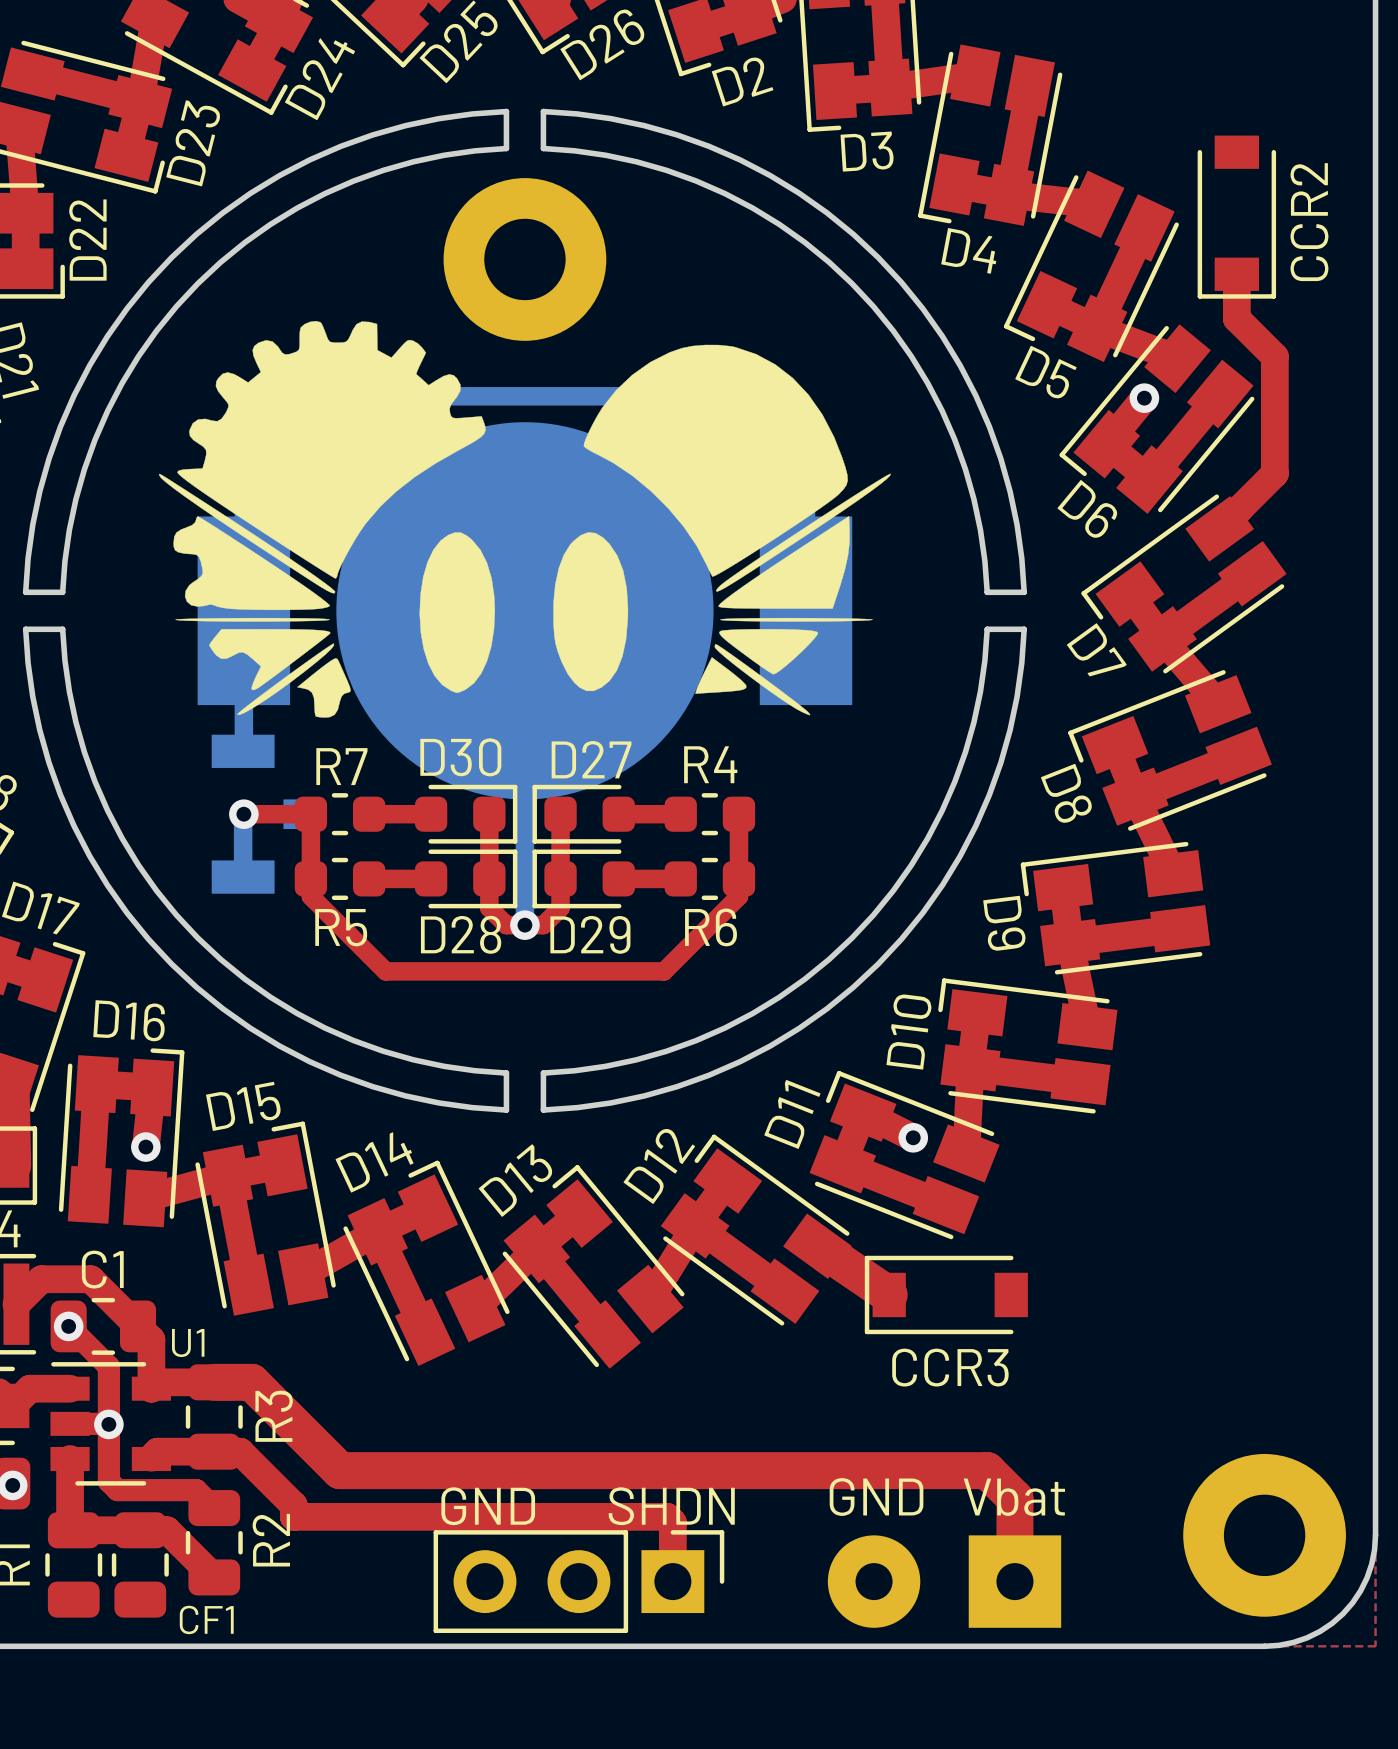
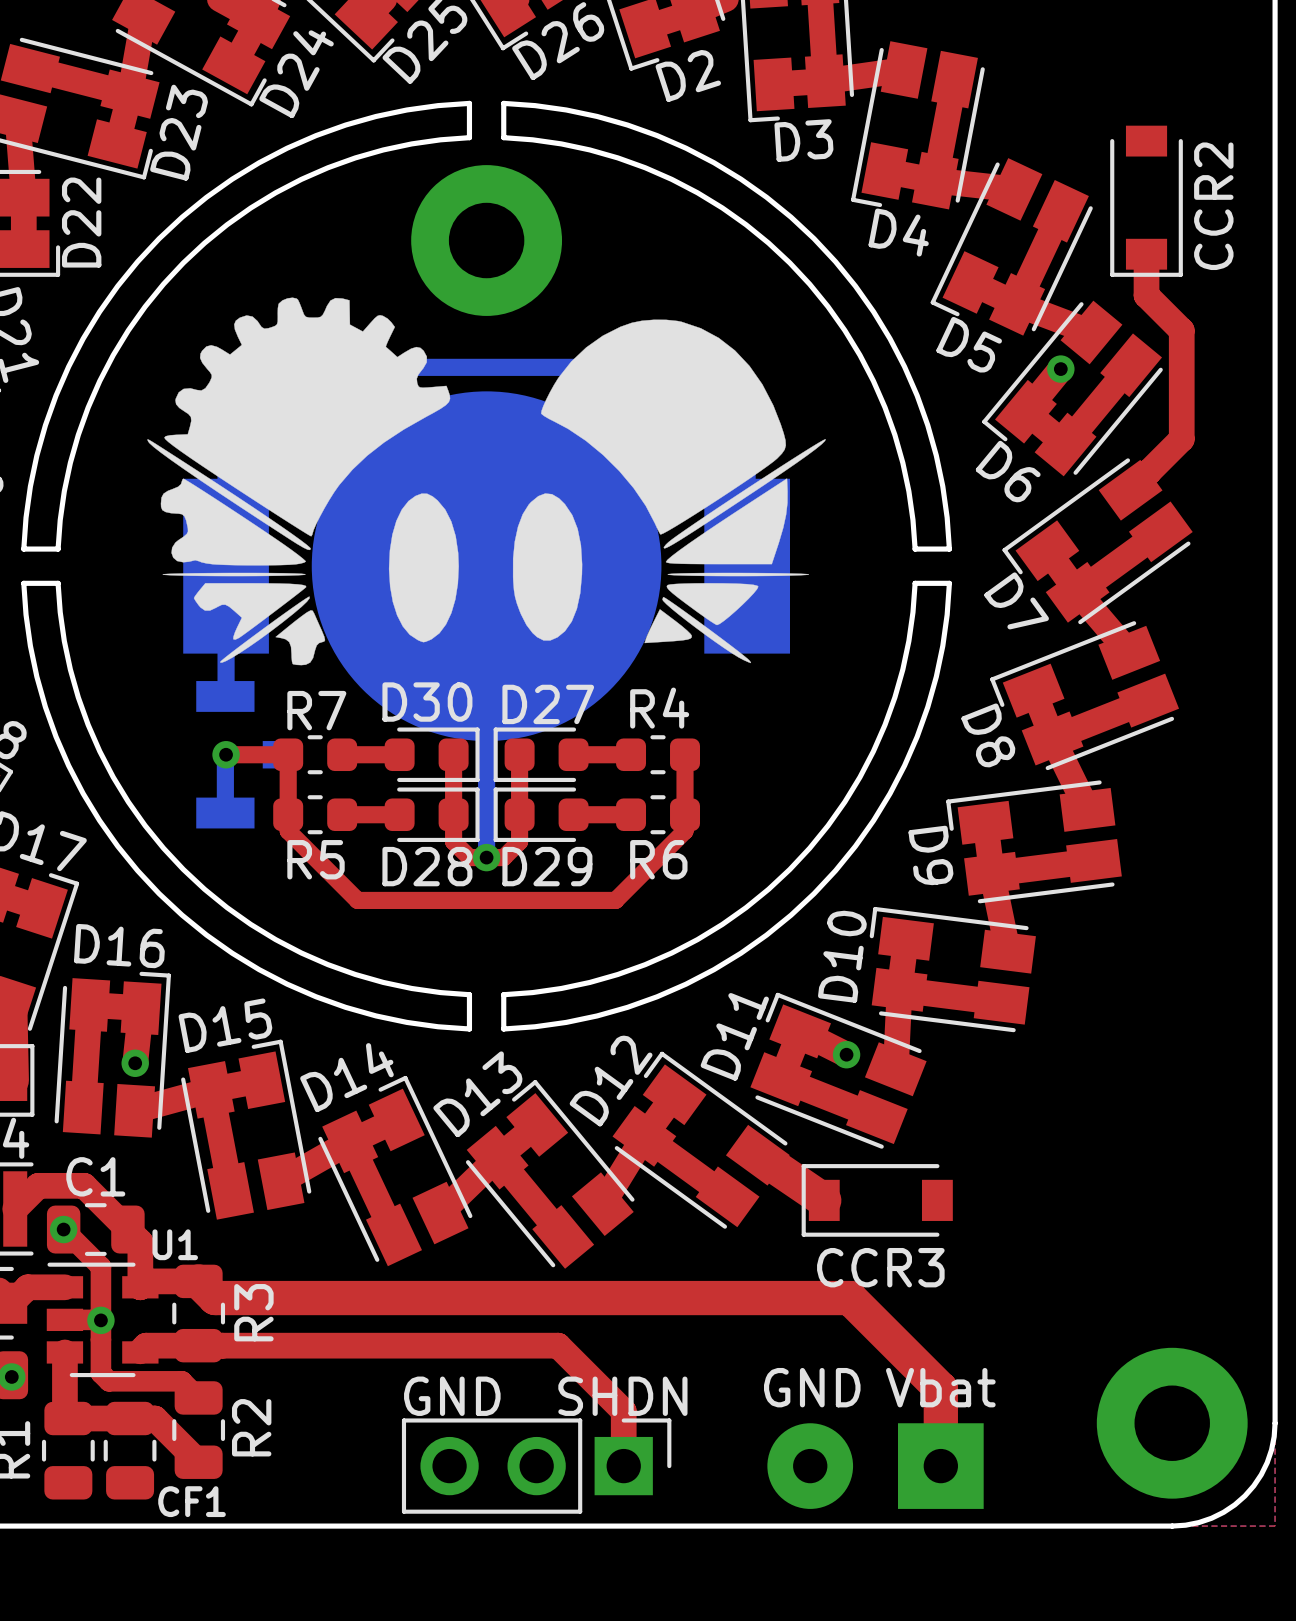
top track: (214, 1382) (251, 1382) (340, 1470) (987, 1470) -> (198, 1281) (215, 1298) (849, 1298) (915, 1363)
top track: (240, 1451) (293, 1505) (293, 1516) (667, 1516) -> (222, 1345) (558, 1345) (618, 1406)

